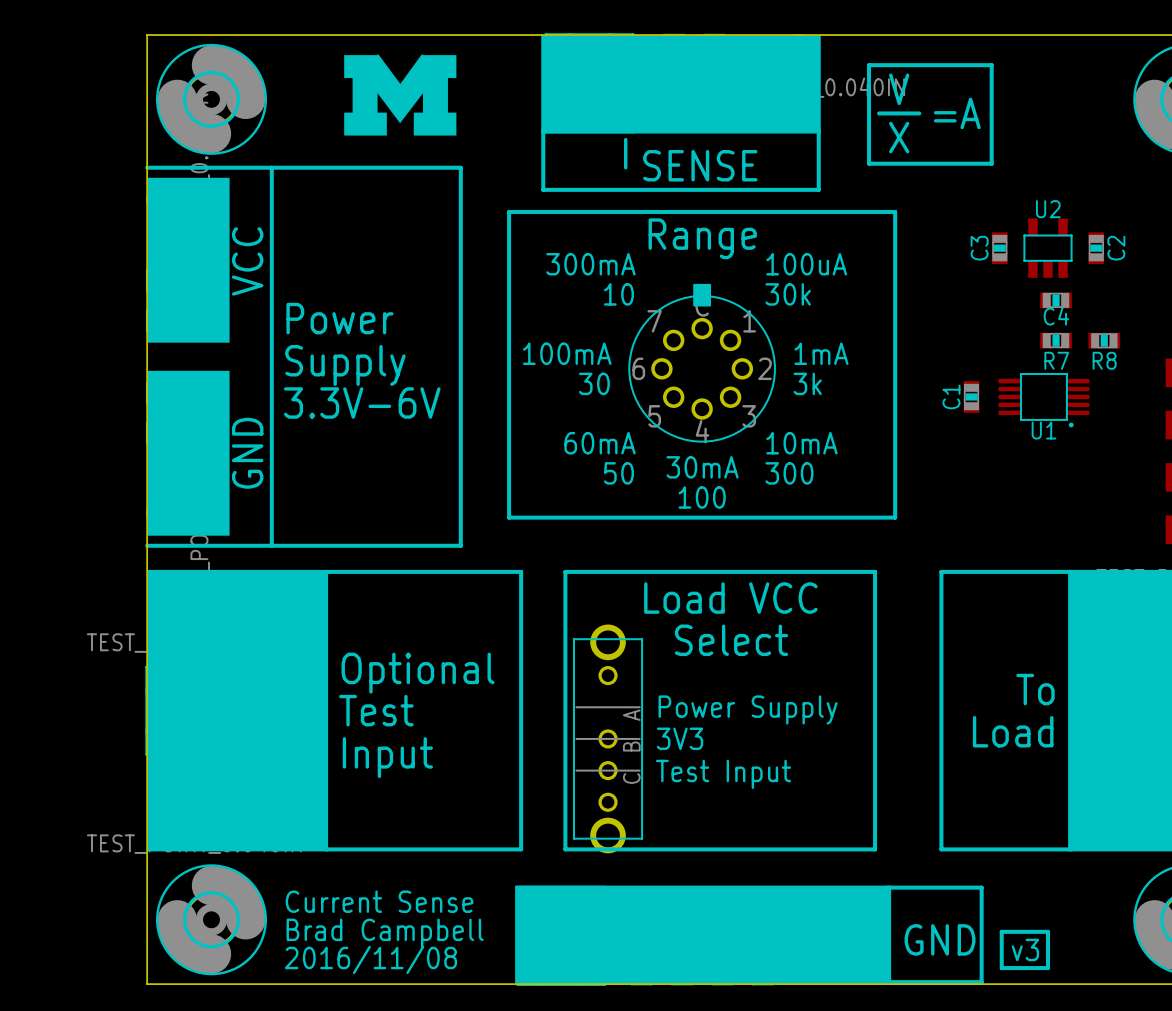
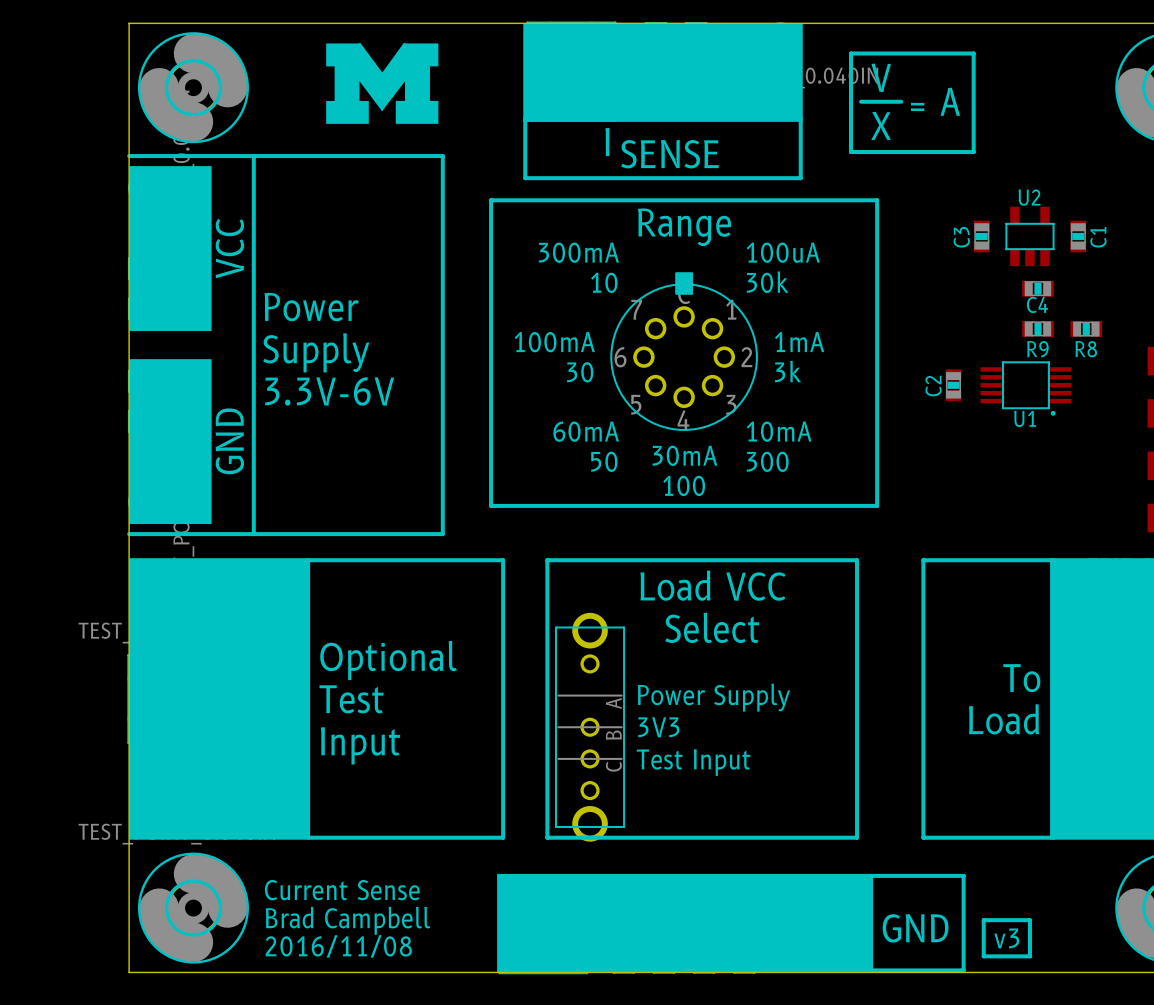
C2 name: C2 (1116, 248) -> C1 (1098, 237)
R7 name: R7 (1056, 360) -> R9 (1037, 349)
C1 name: C1 (951, 396) -> C2 (933, 386)

